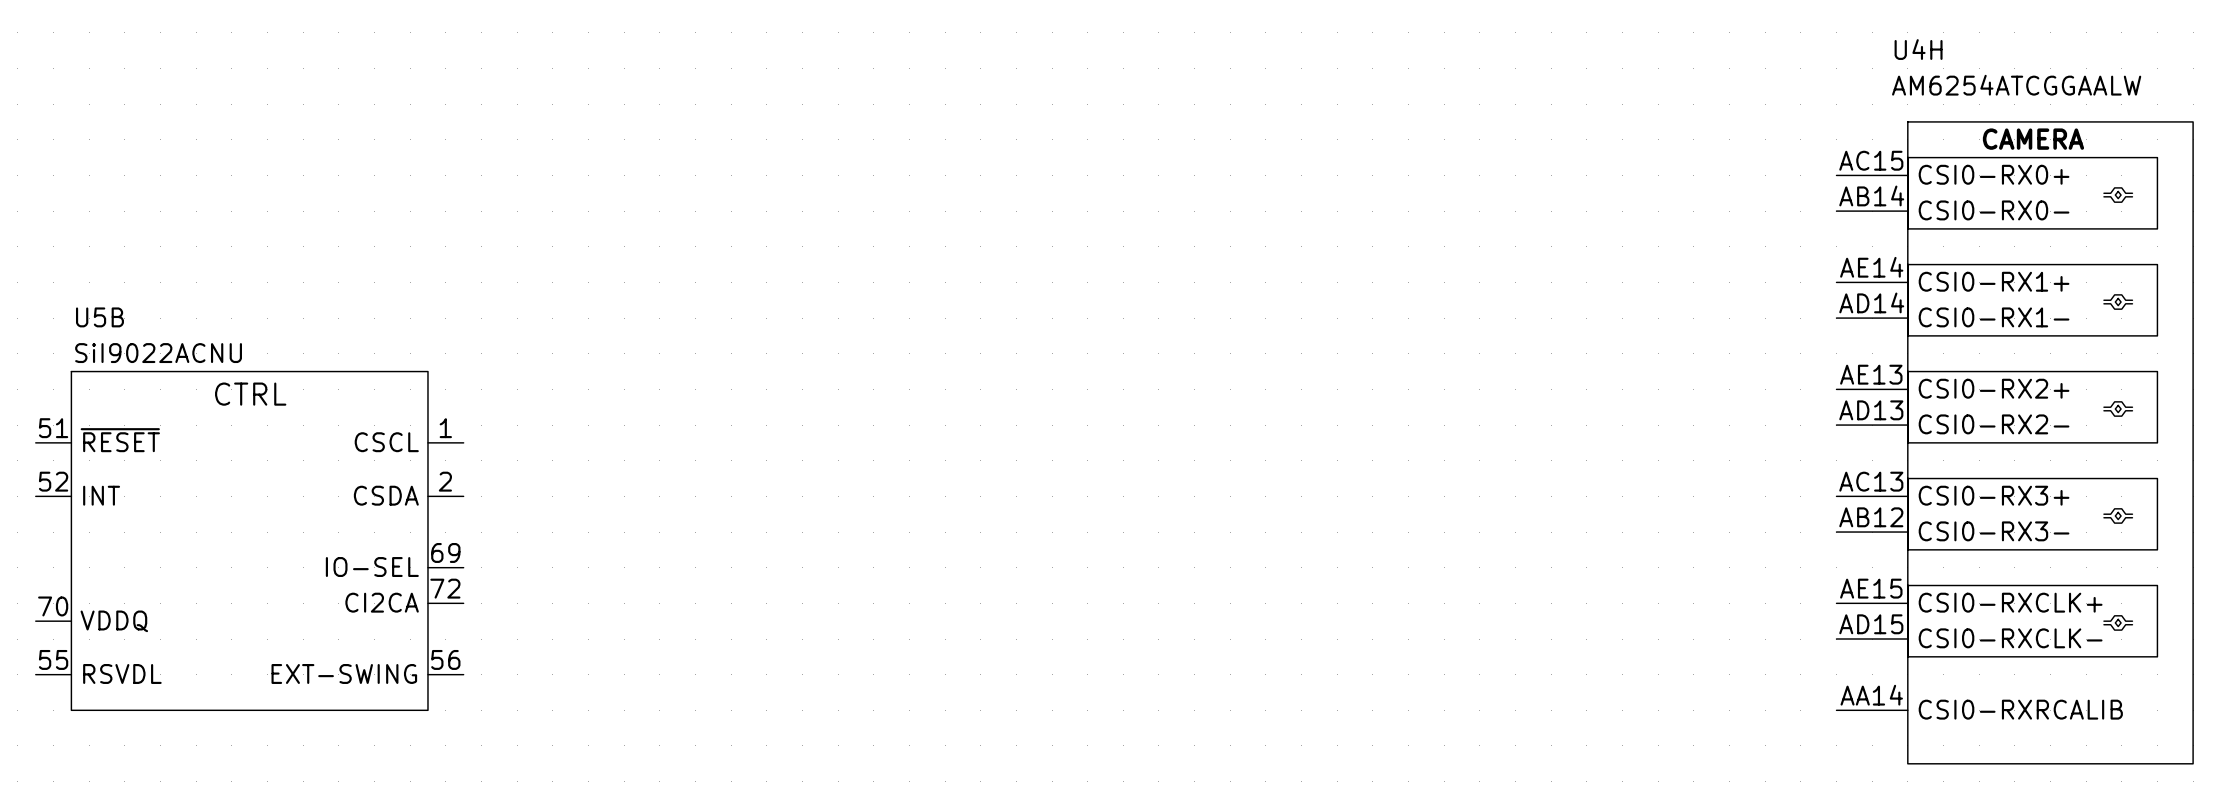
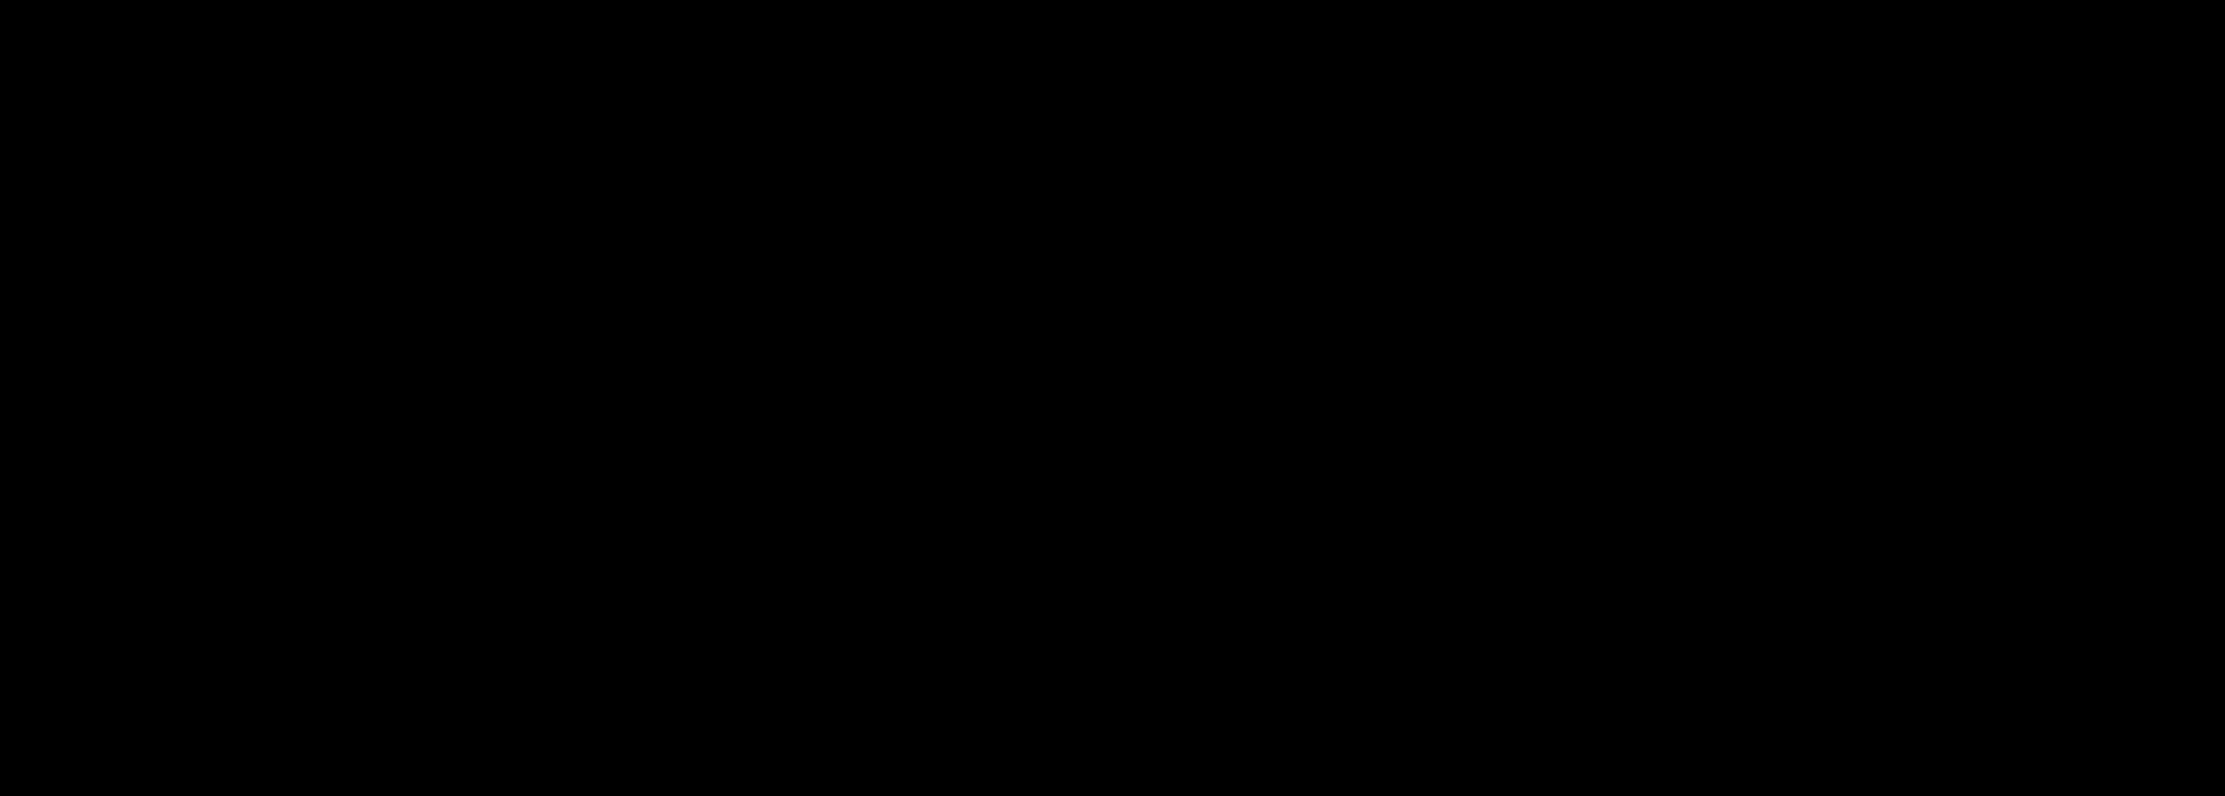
U4H: AM6254ATCGGAALW (2014, 442) -> none
U5B: SiI9022ACNU (249, 540) -> none

